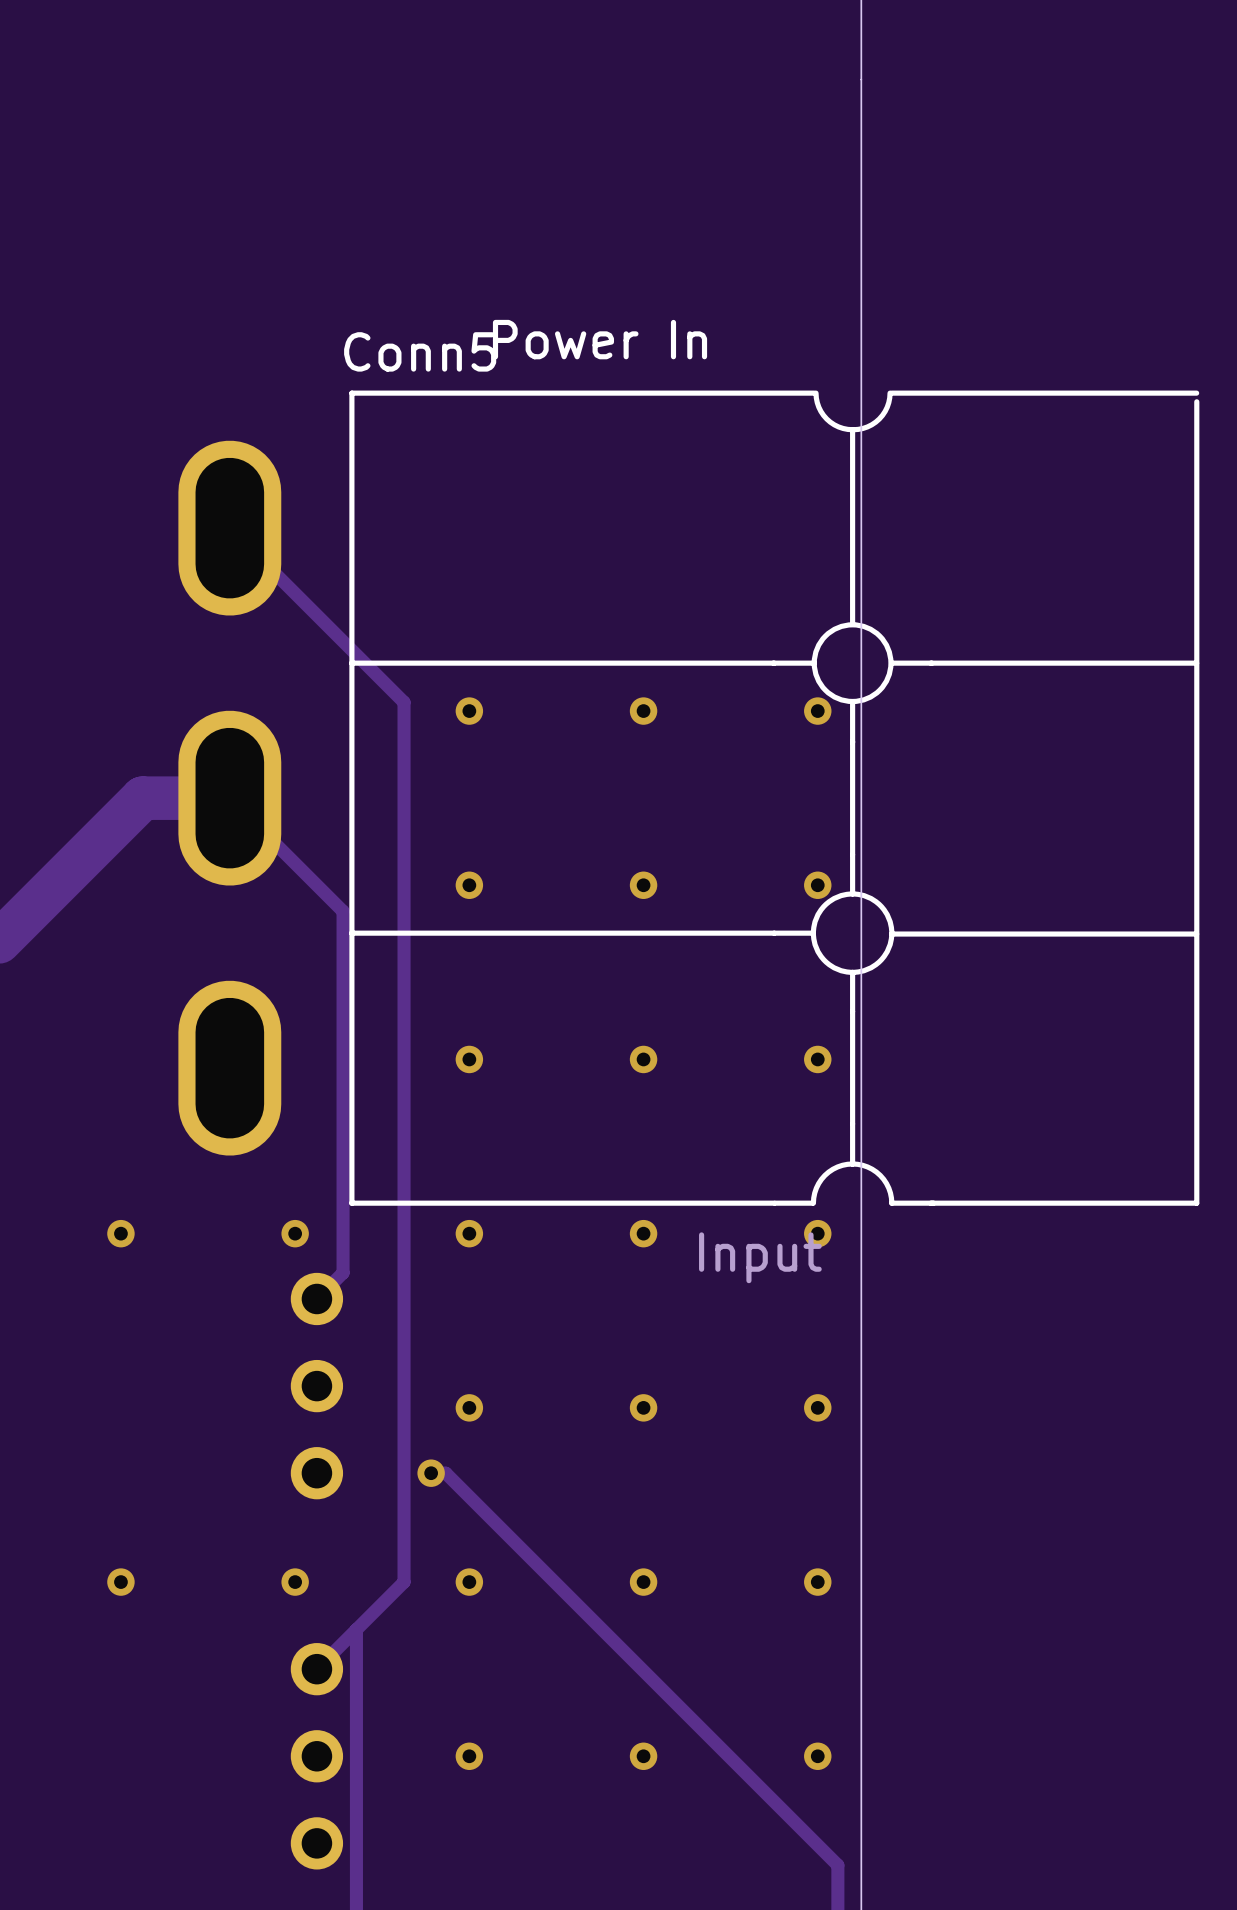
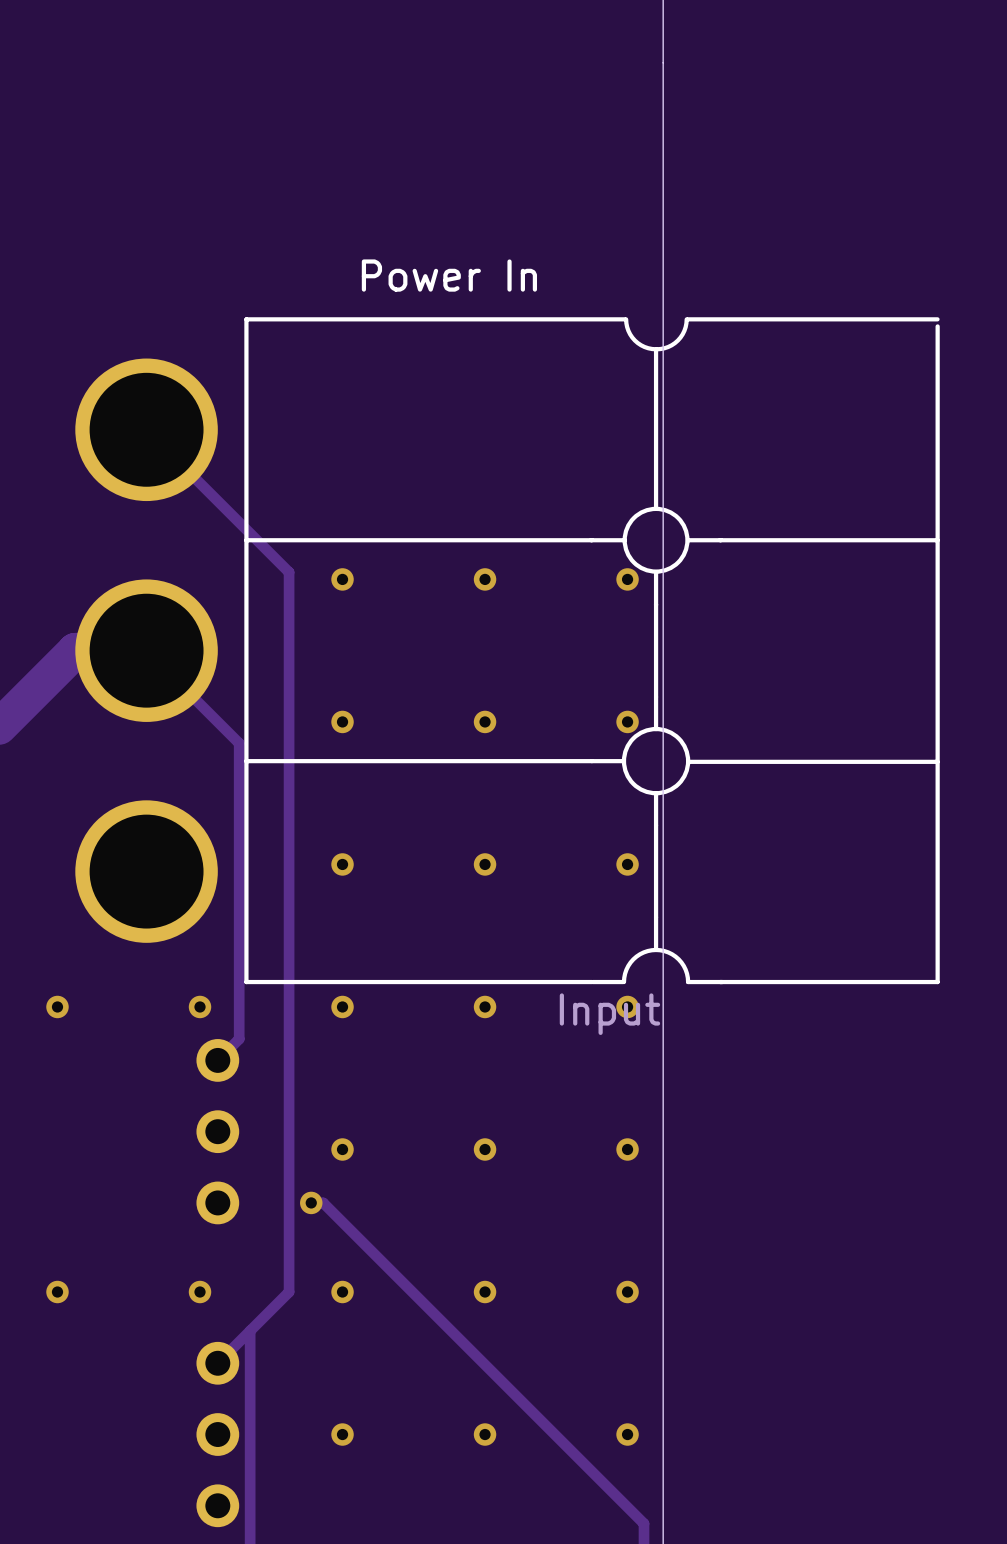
part: none -> Input (507, 650)
Conn5: Input (688, 798) -> none

